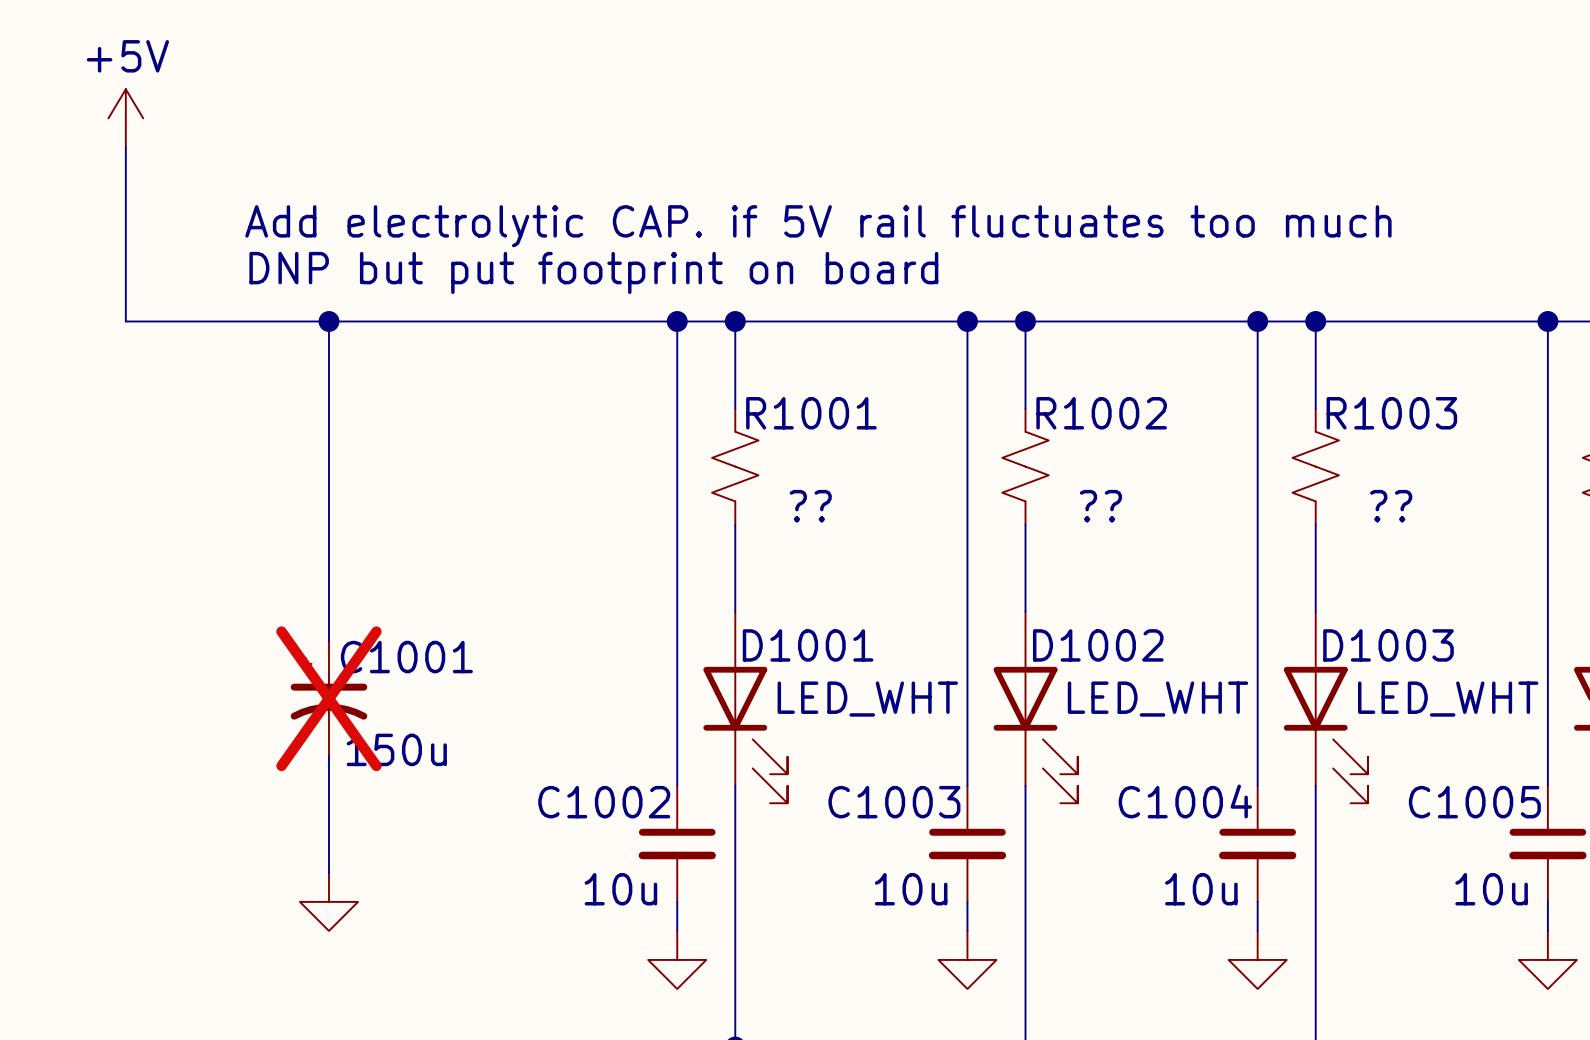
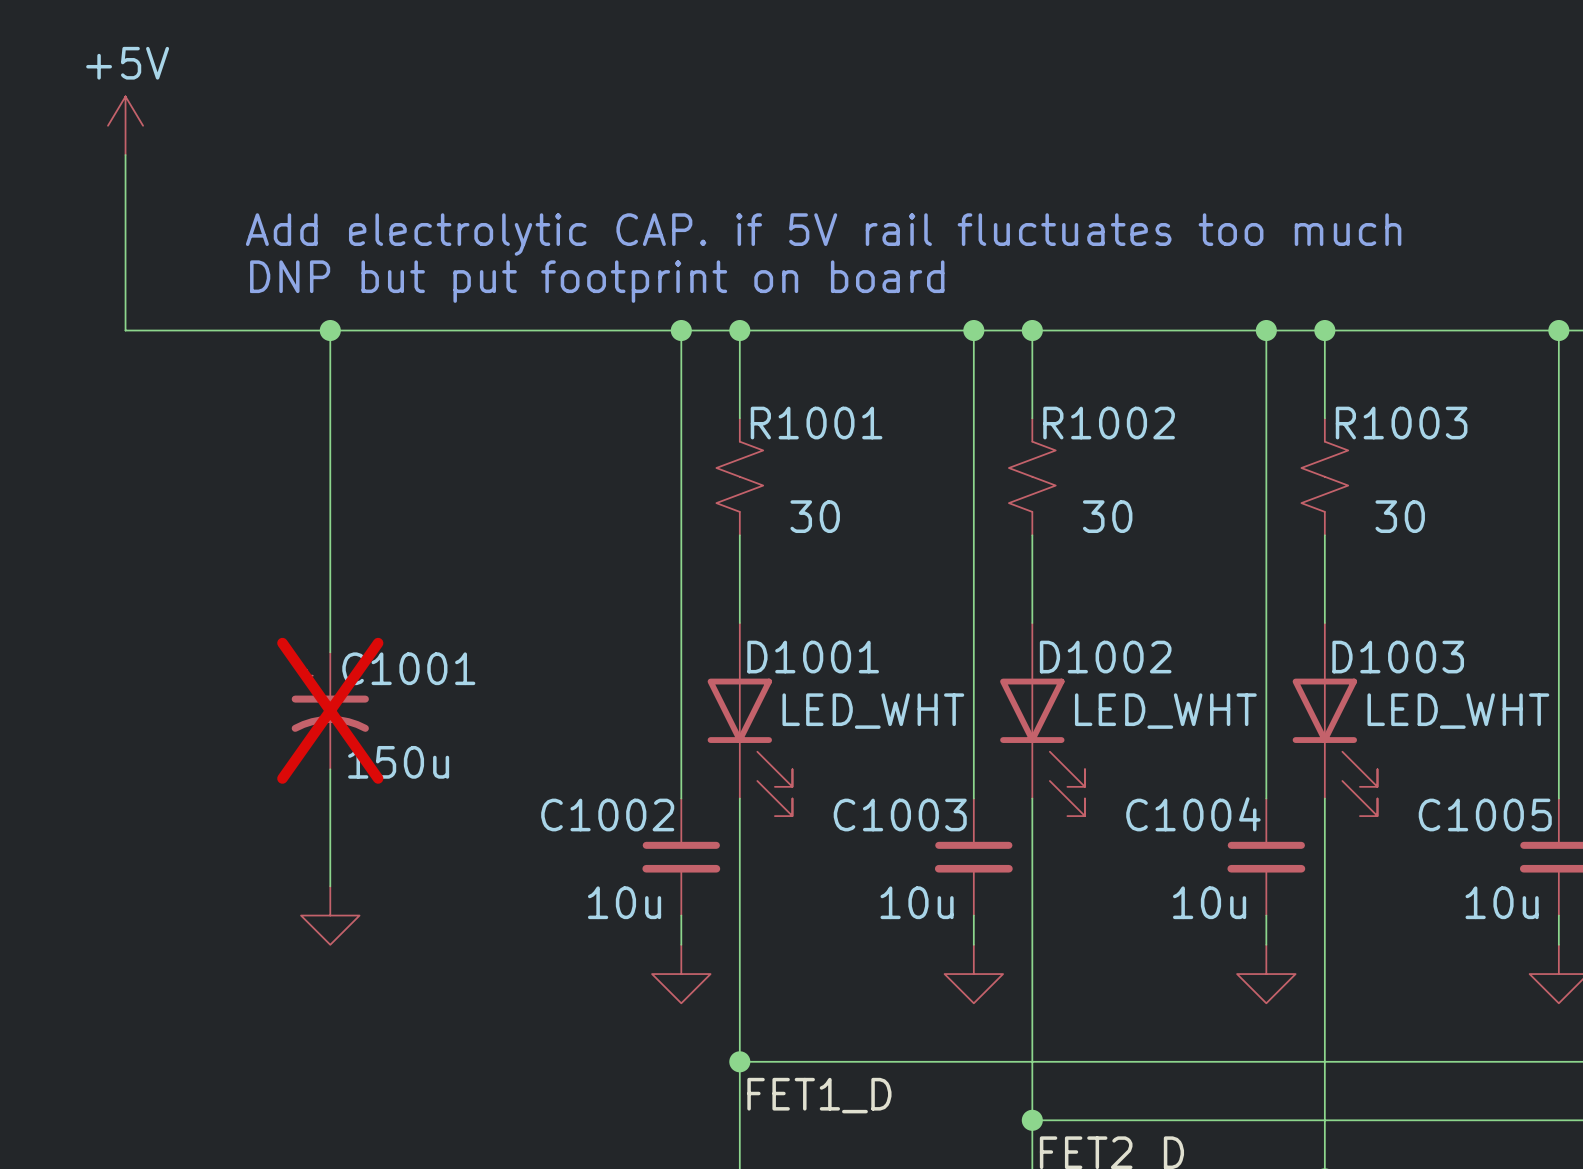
R1001 value: ?? (810, 506) -> 30 (815, 516)
R1002 value: ?? (1100, 506) -> 30 (1107, 516)
R1003 value: ?? (1391, 506) -> 30 (1400, 516)

